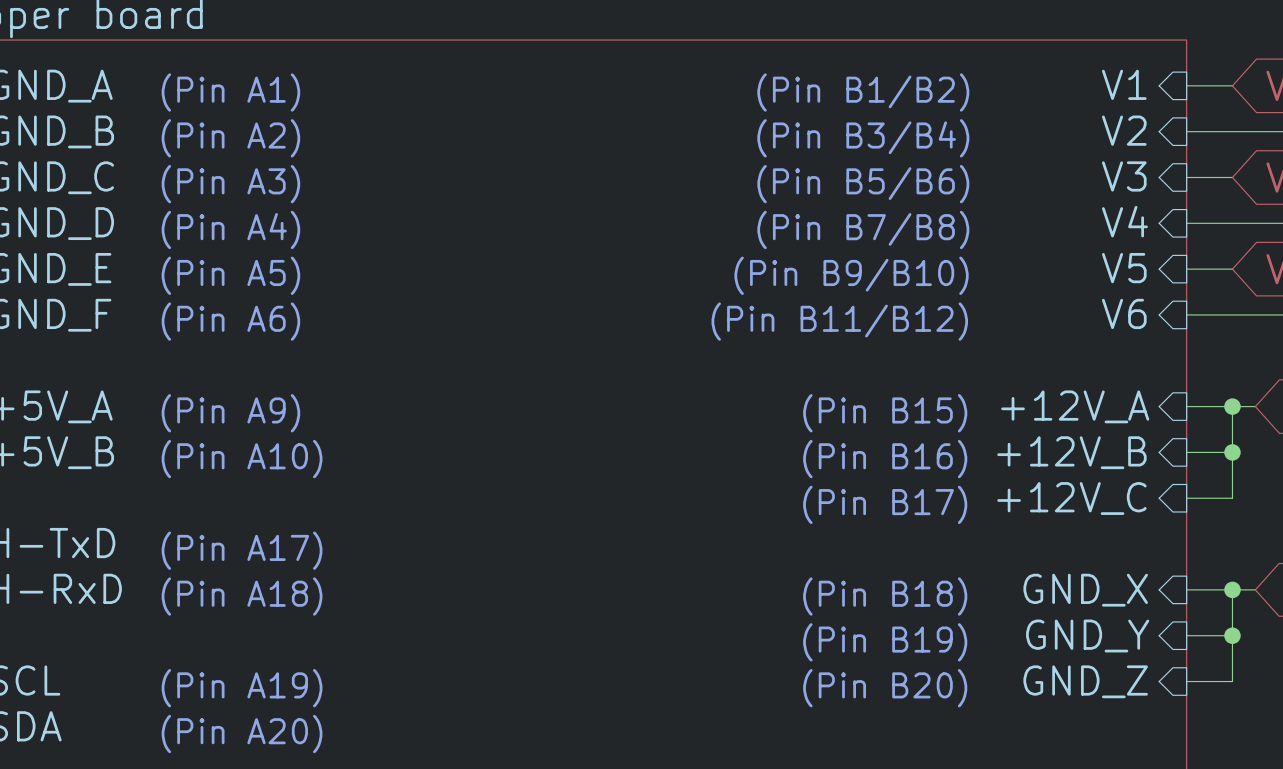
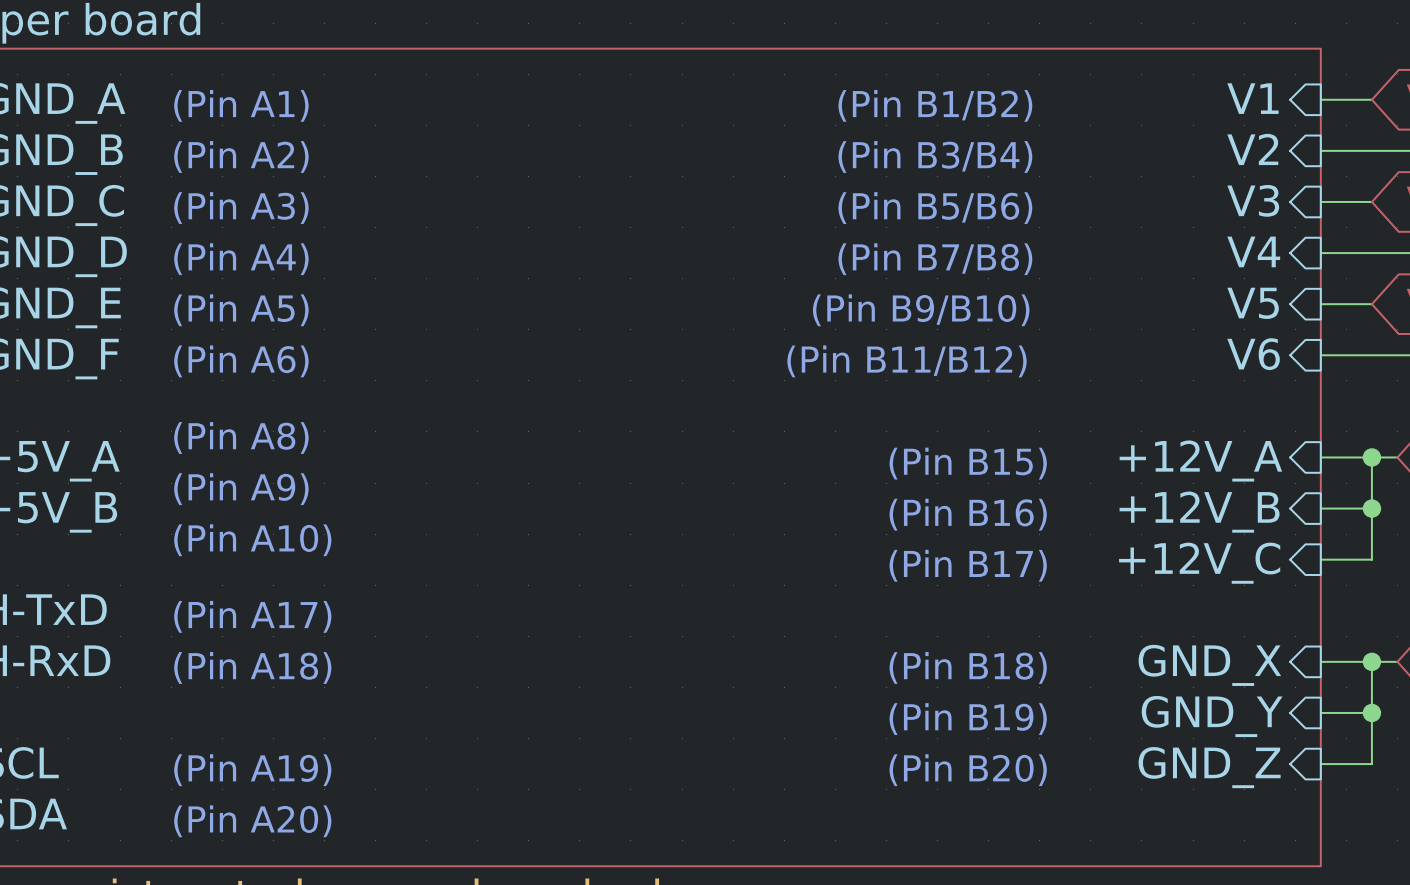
text: none -> (Pin A8) (241, 438)
text position: (Pin A9) (230, 413) -> (Pin A9) (241, 489)
text position: (Pin A10) (242, 459) -> (Pin A10) (252, 540)

